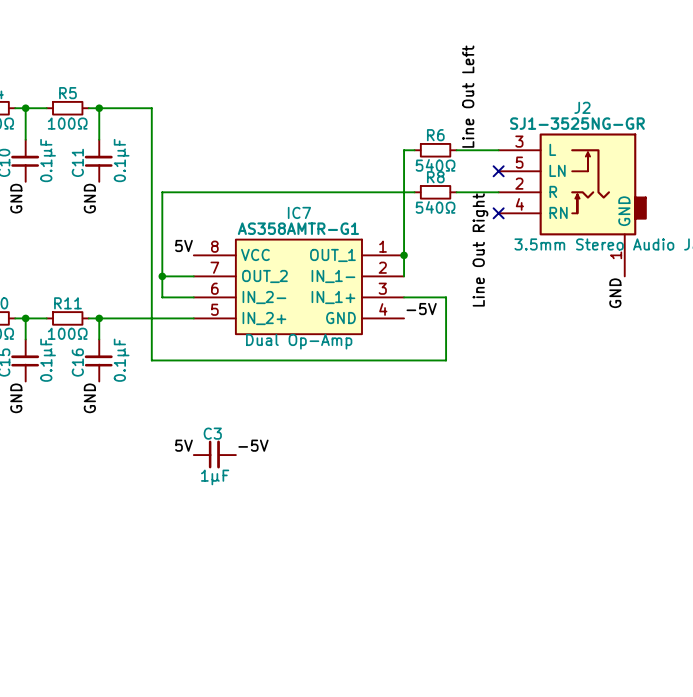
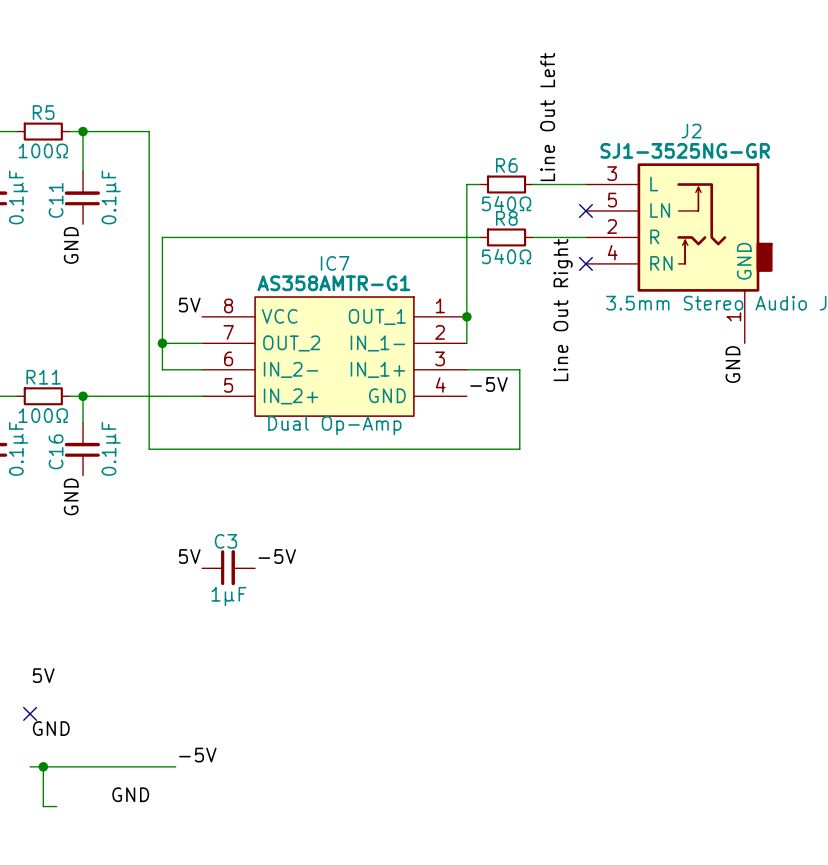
label: none -> 5V (43, 675)
no-connect mark: none -> (30, 713)
label: none -> GND (51, 728)
label: none -> -5V (197, 755)
wire: none -> (30, 766) (175, 766)
wire: none -> (43, 766) (43, 806) (56, 806)
junction: none -> (43, 766)
label: none -> GND (130, 794)

